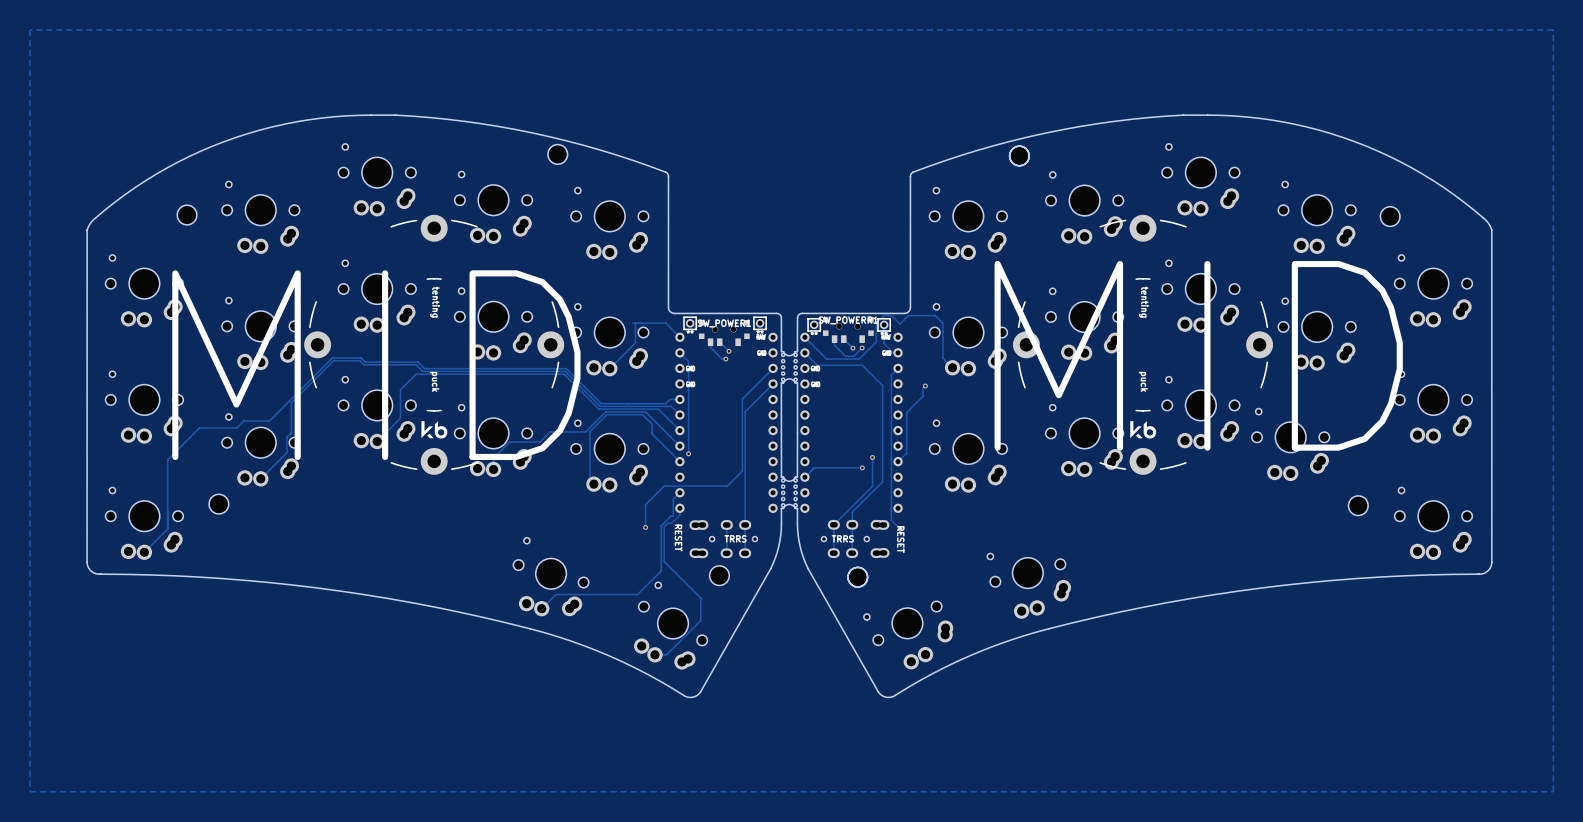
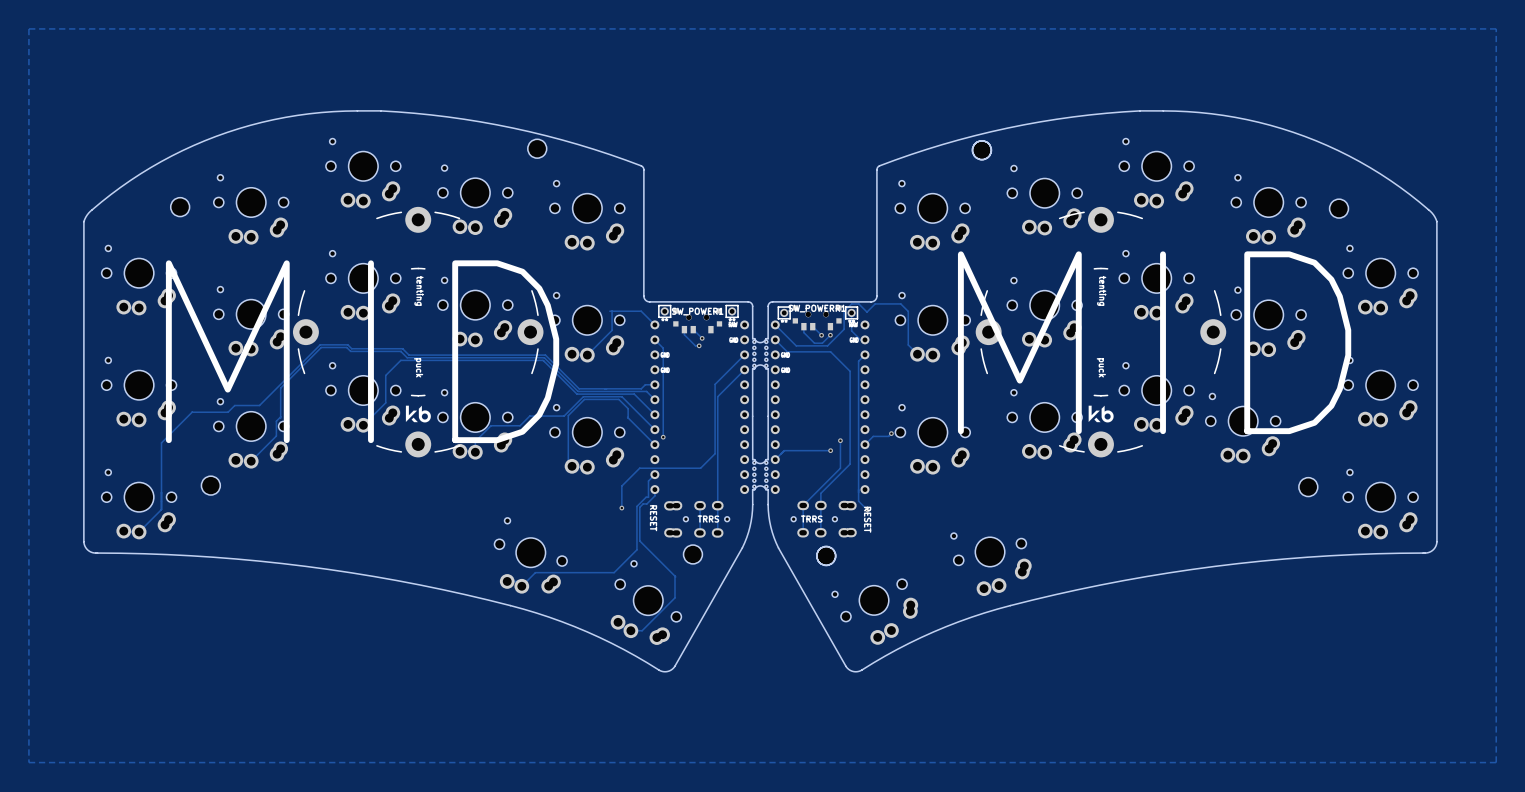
track: (925, 386) (922, 388) (922, 396) (906, 412) (906, 453) -> (891, 433) (888, 436) (873, 436)
via: (925, 386) -> none
via: none -> (891, 433)

